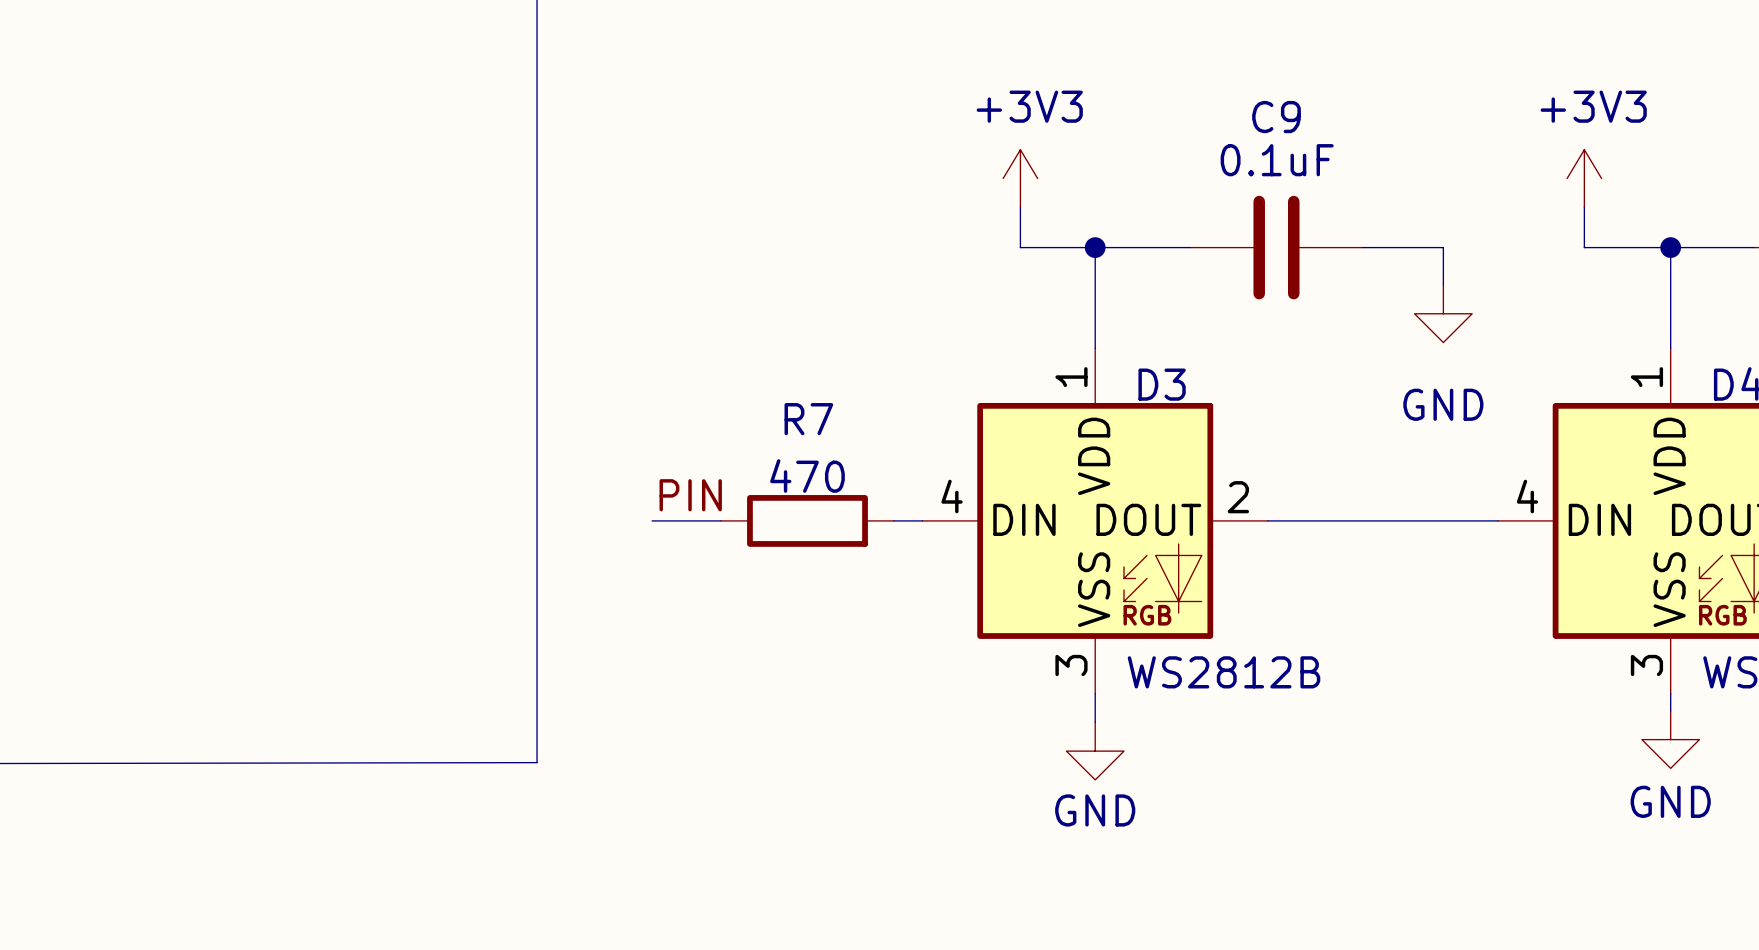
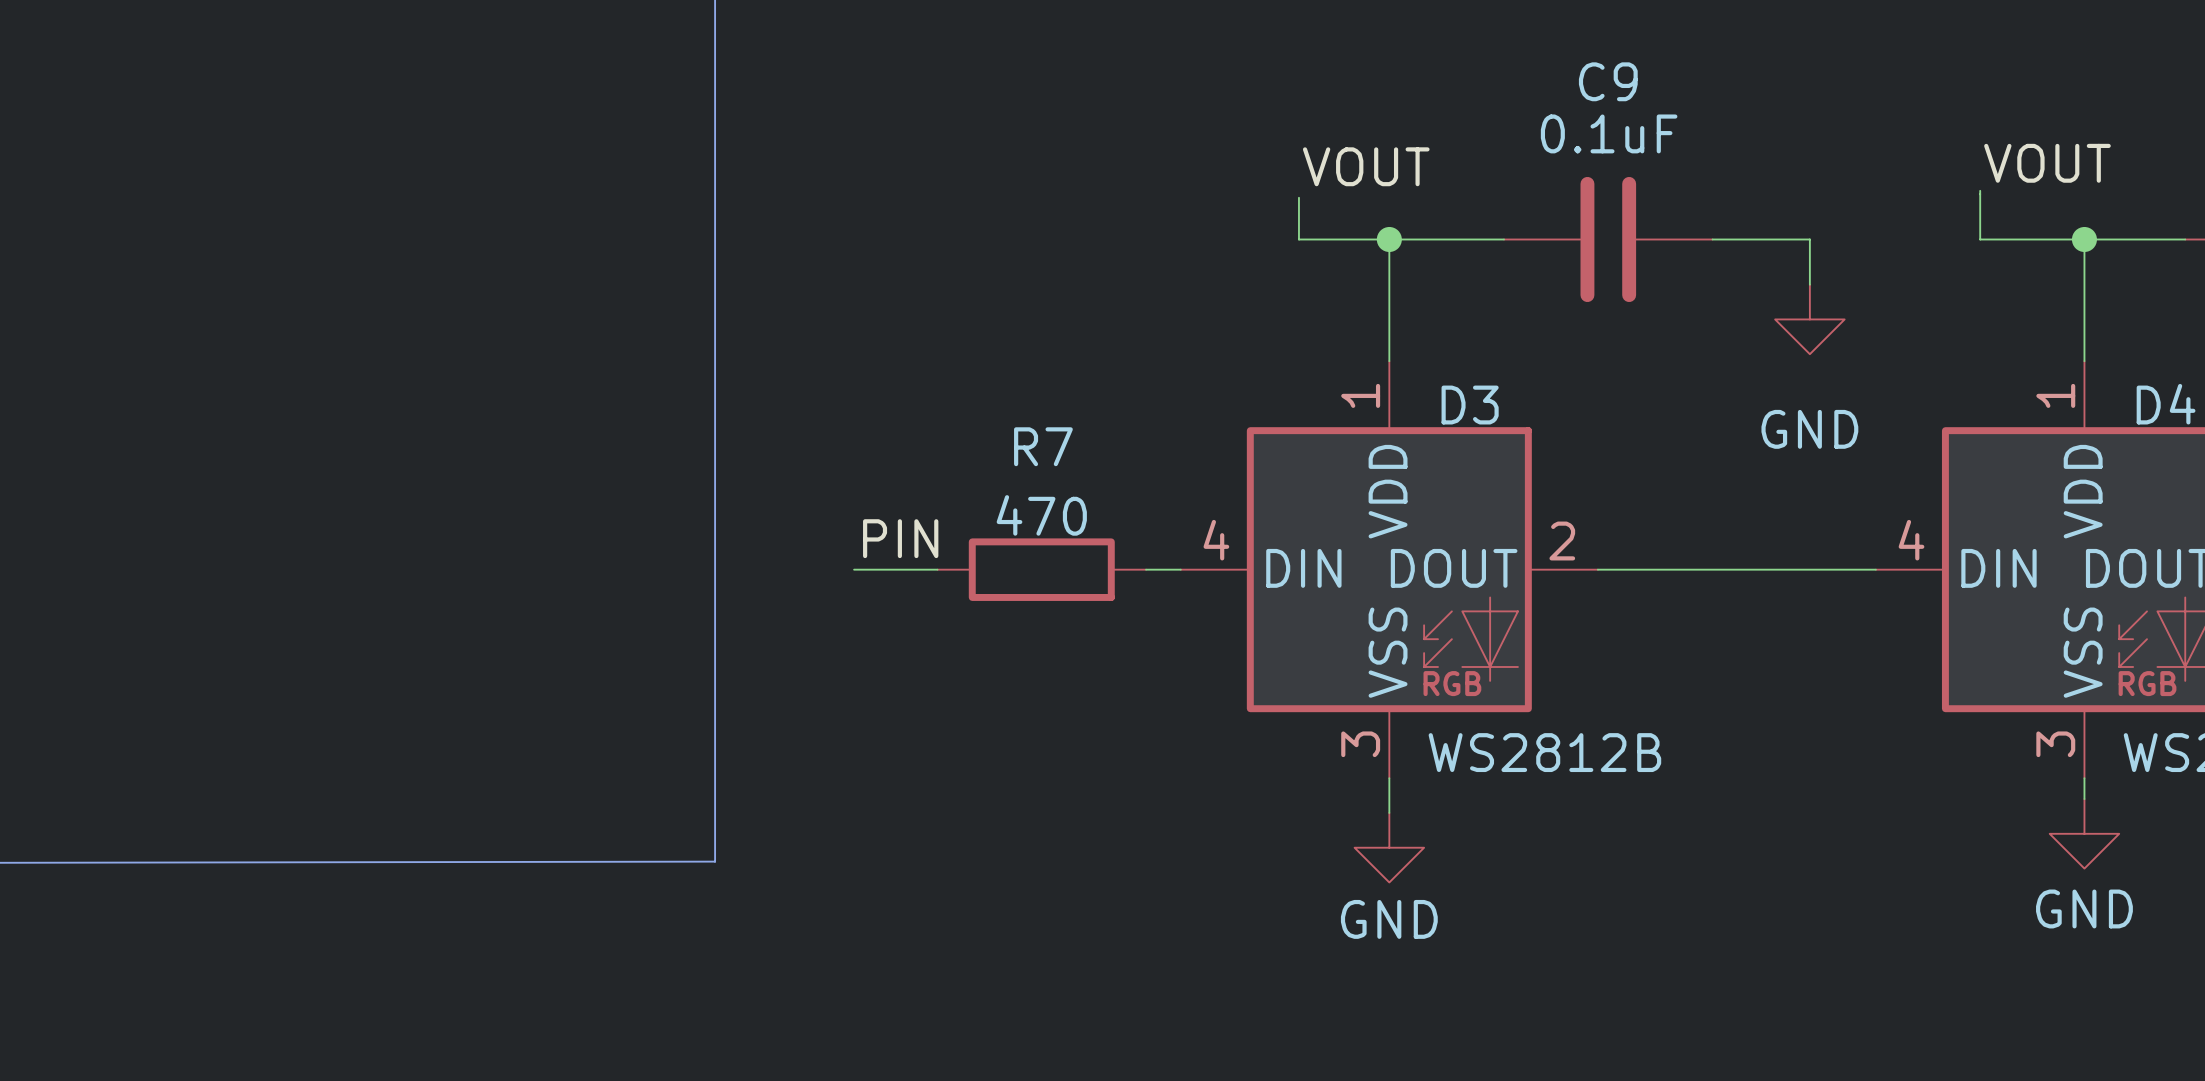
power symbol: +3V3 (1020, 178) -> none
power symbol: +3V3 (1584, 178) -> none
label: none -> VOUT (2047, 163)
label: none -> VOUT (1366, 166)
wire: (1020, 207) (1020, 213) -> none

